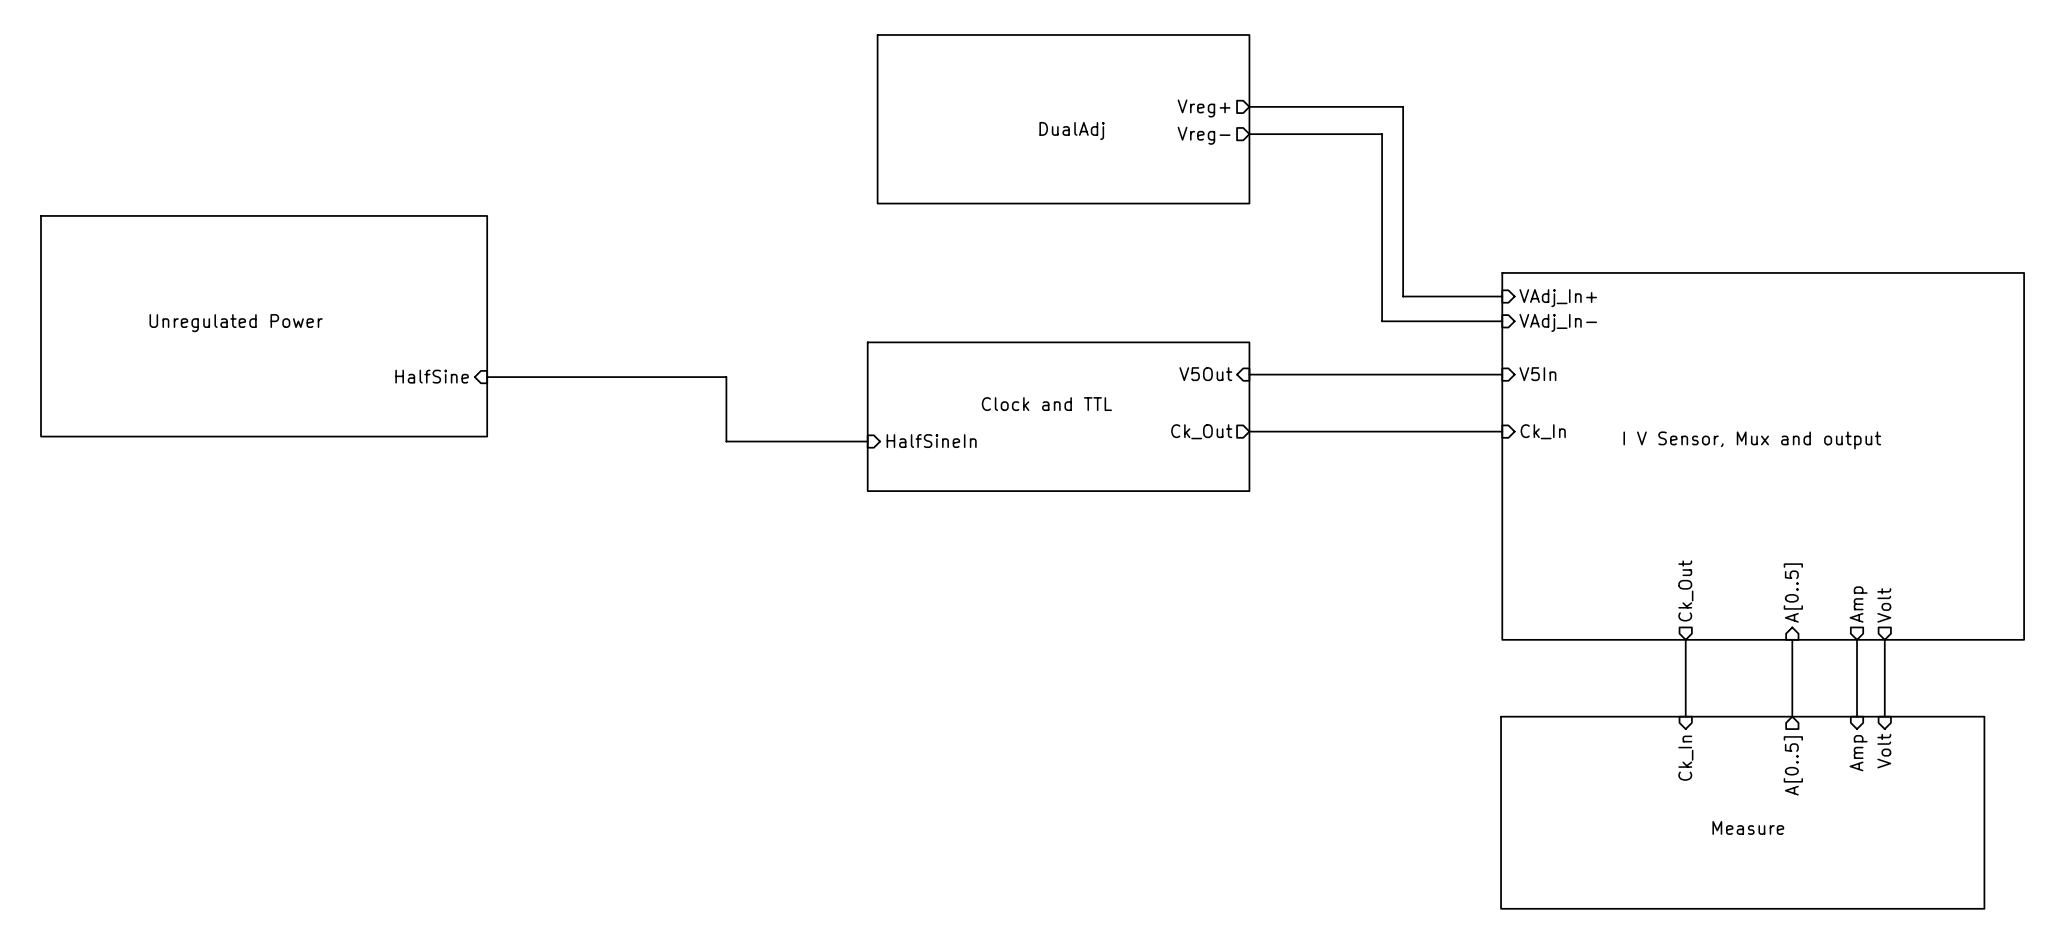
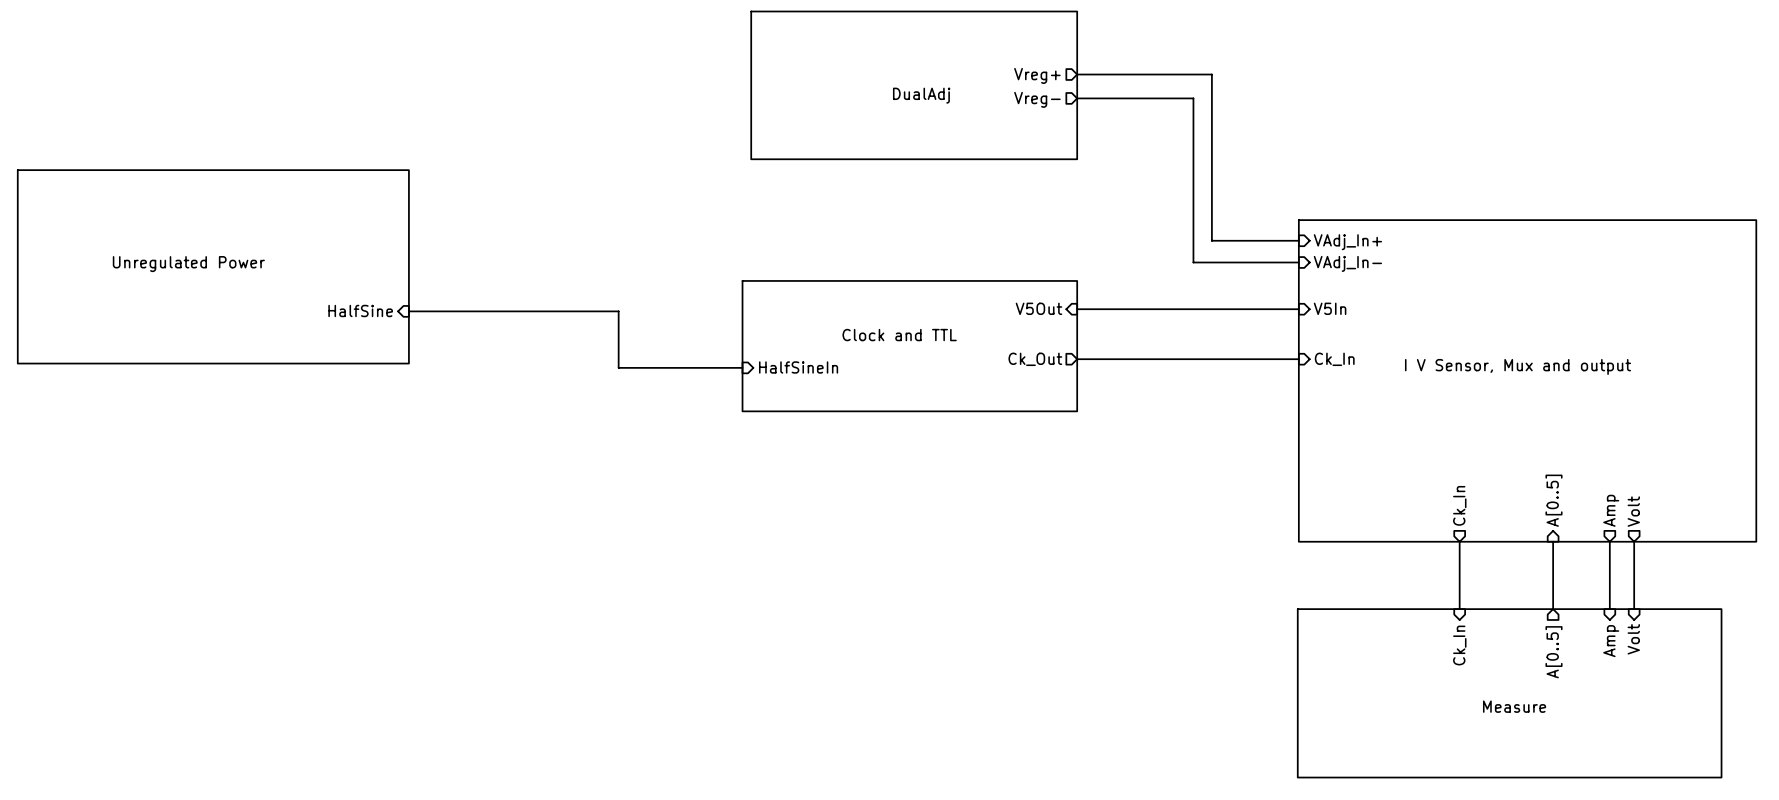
sheet pin: Ck_Out (1685, 590) -> Ck_In (1459, 505)

